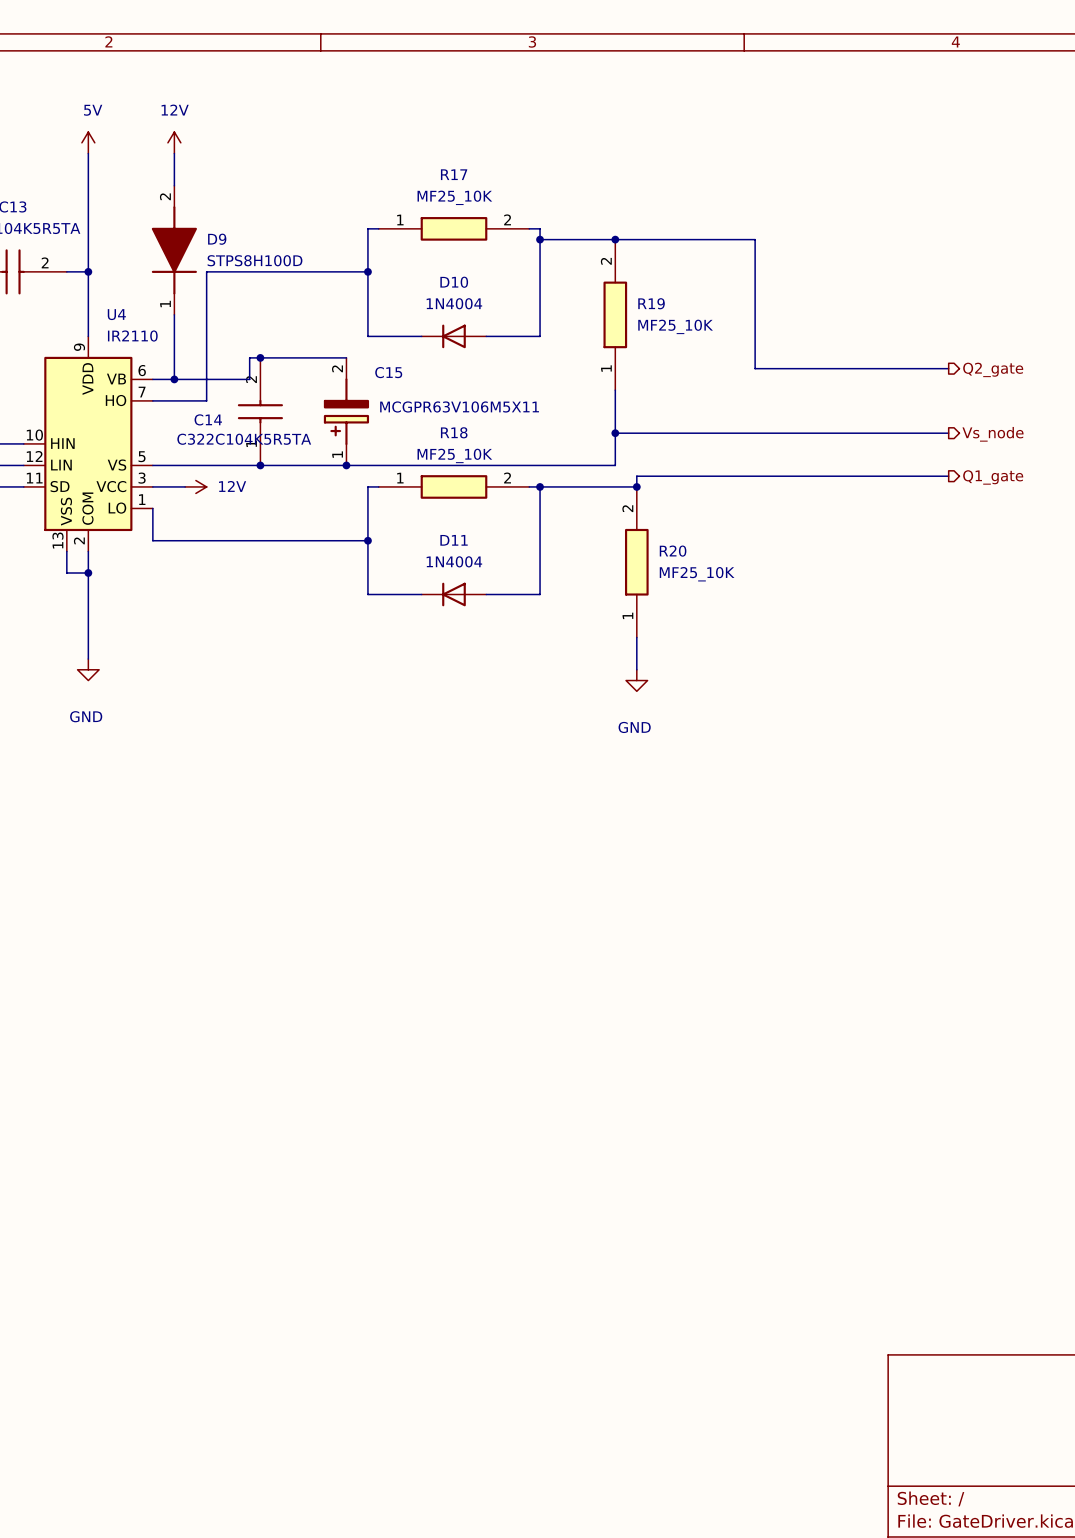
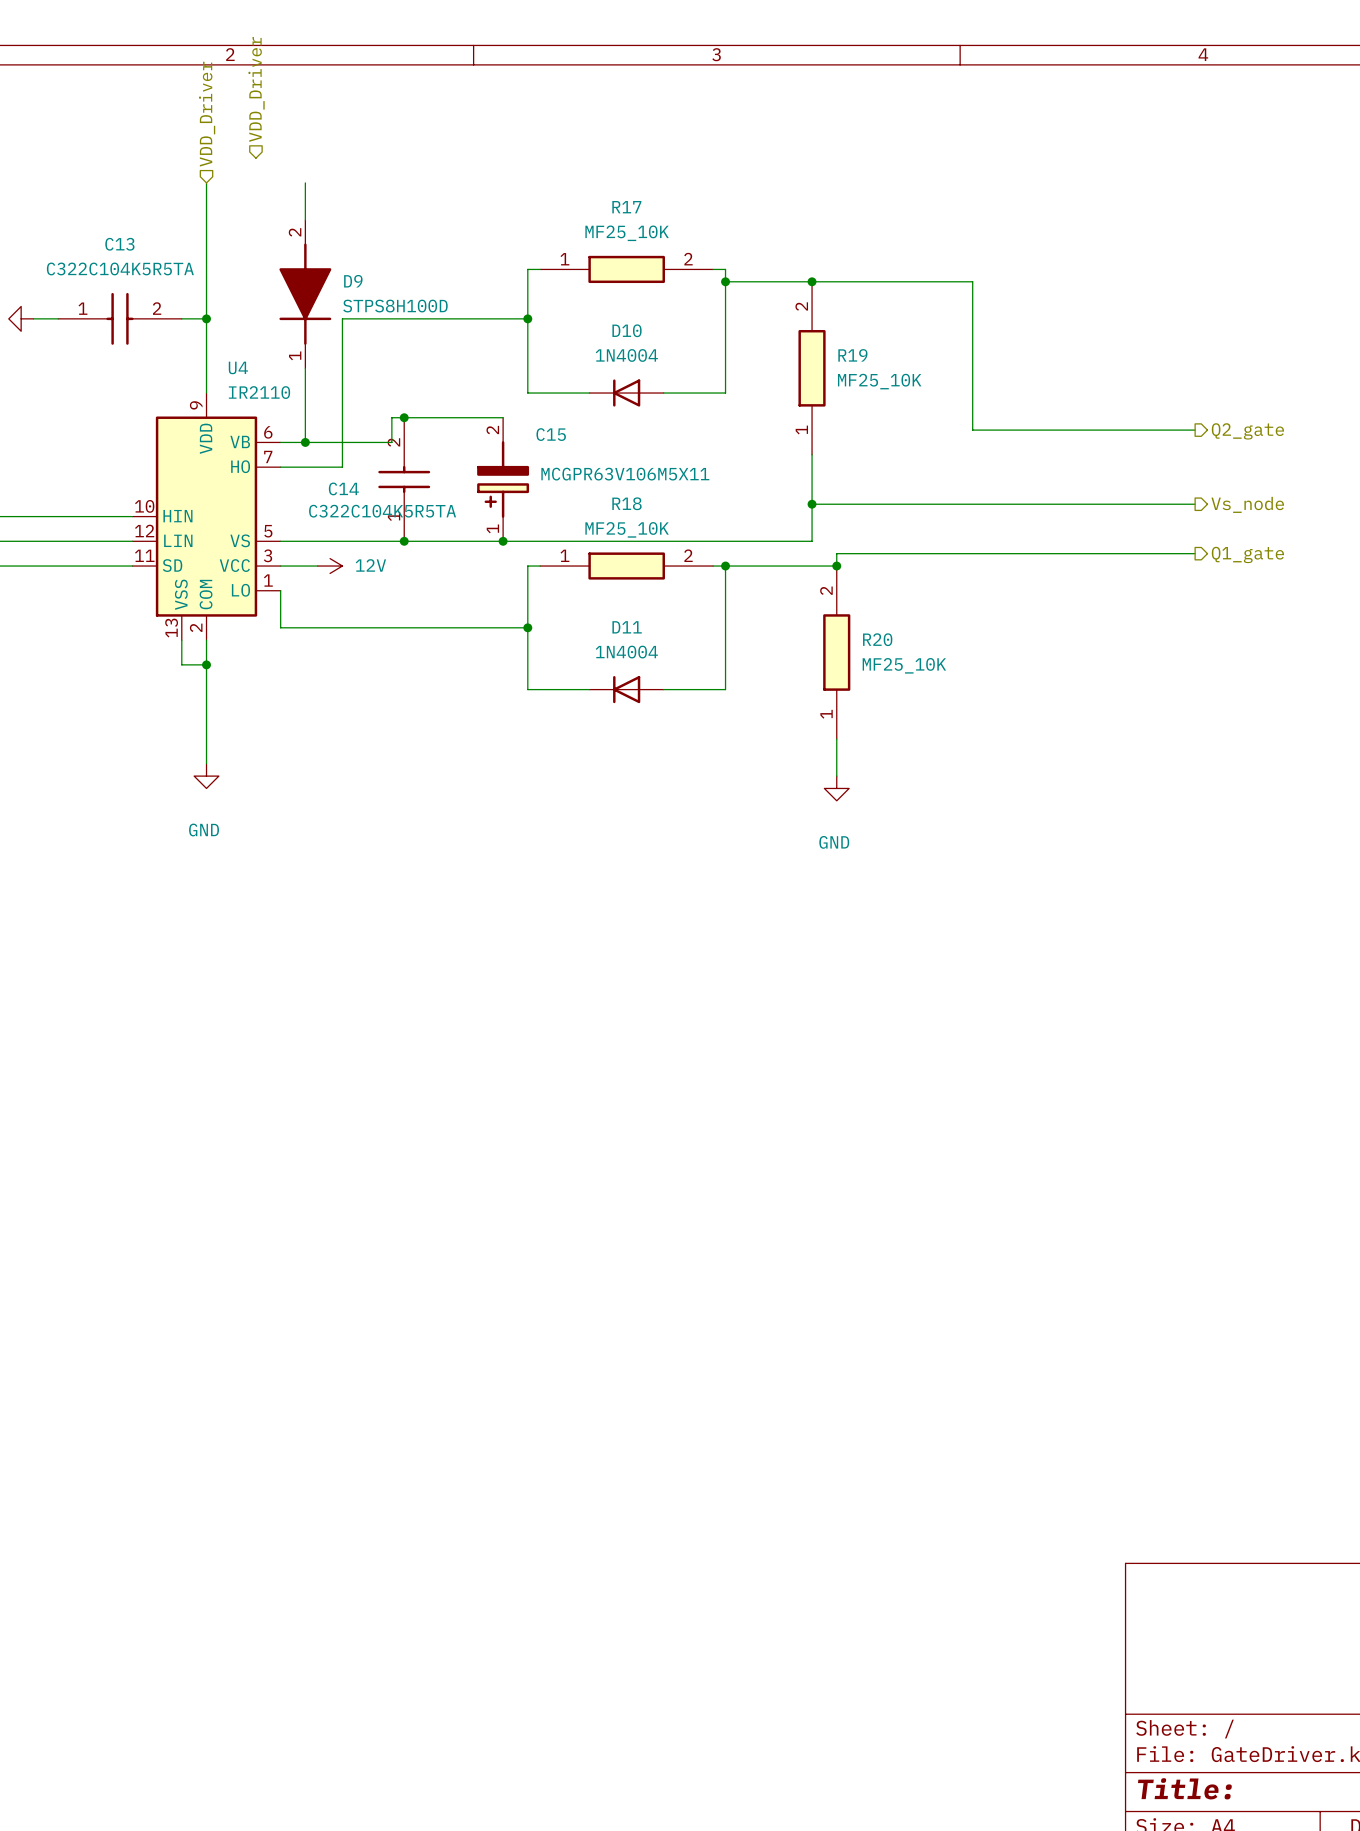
hierarchical label: none -> VDD_Driver (256, 89)
hierarchical label: none -> VDD_Driver (207, 114)
power symbol: 5V (88, 142) -> none
power symbol: 12V (174, 142) -> none

